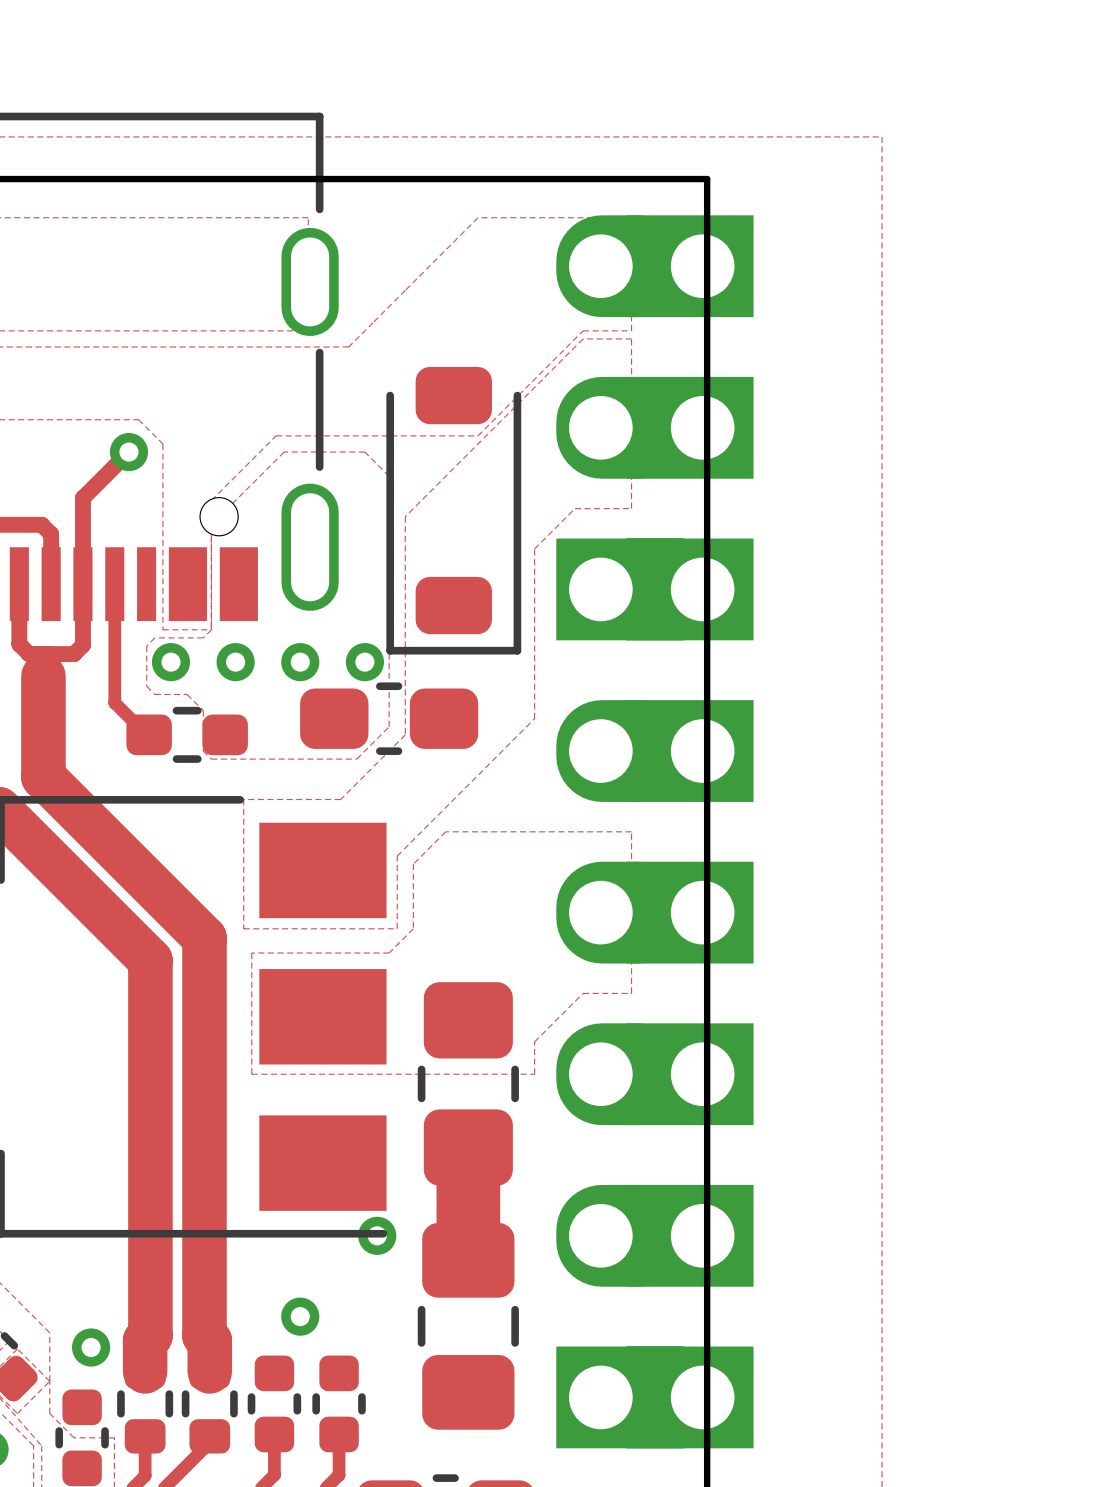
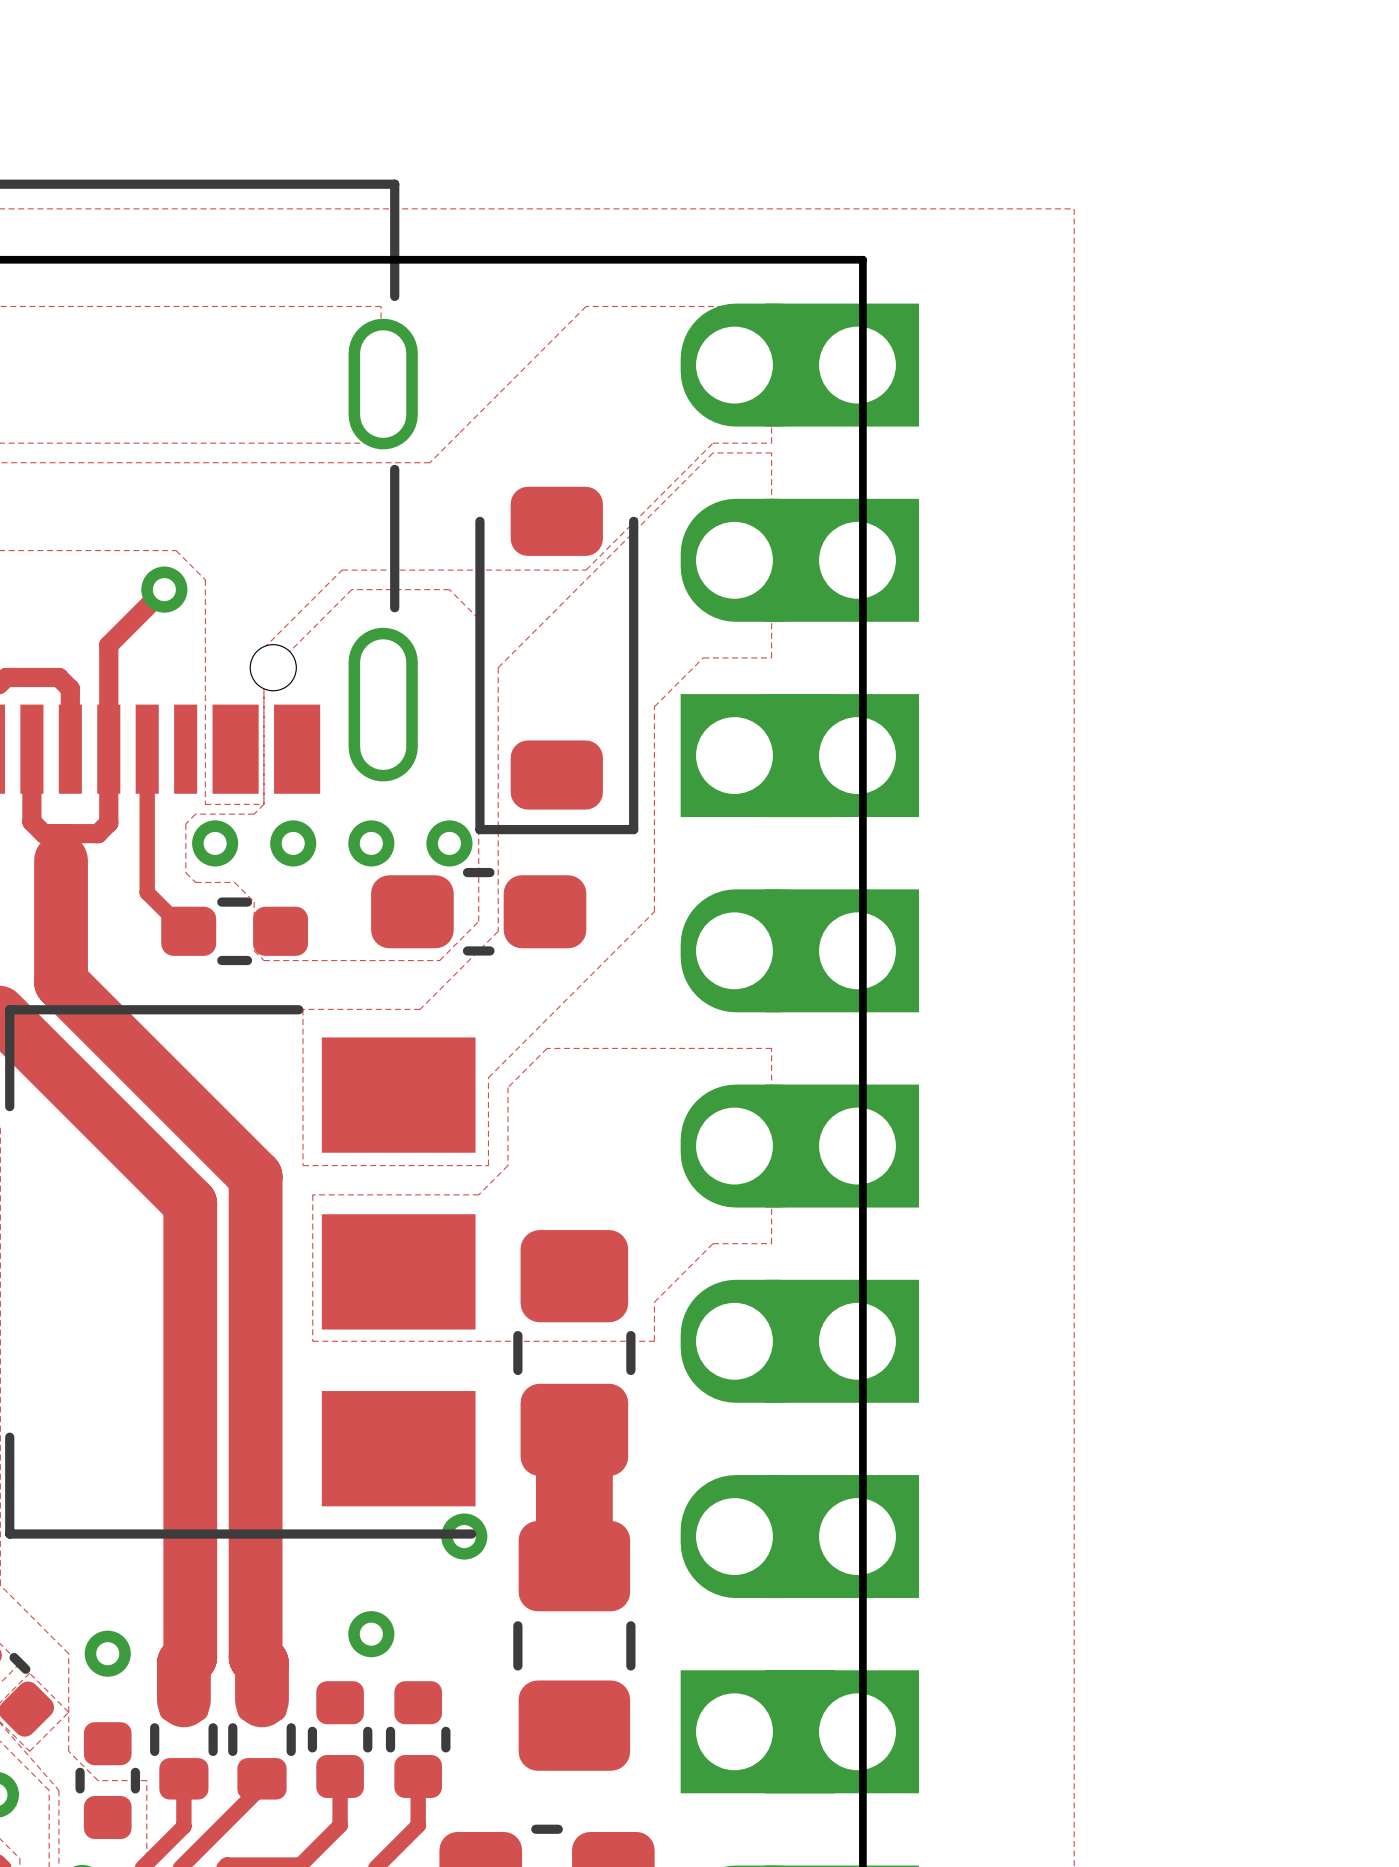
via position: (91, 1347) -> (107, 1653)

